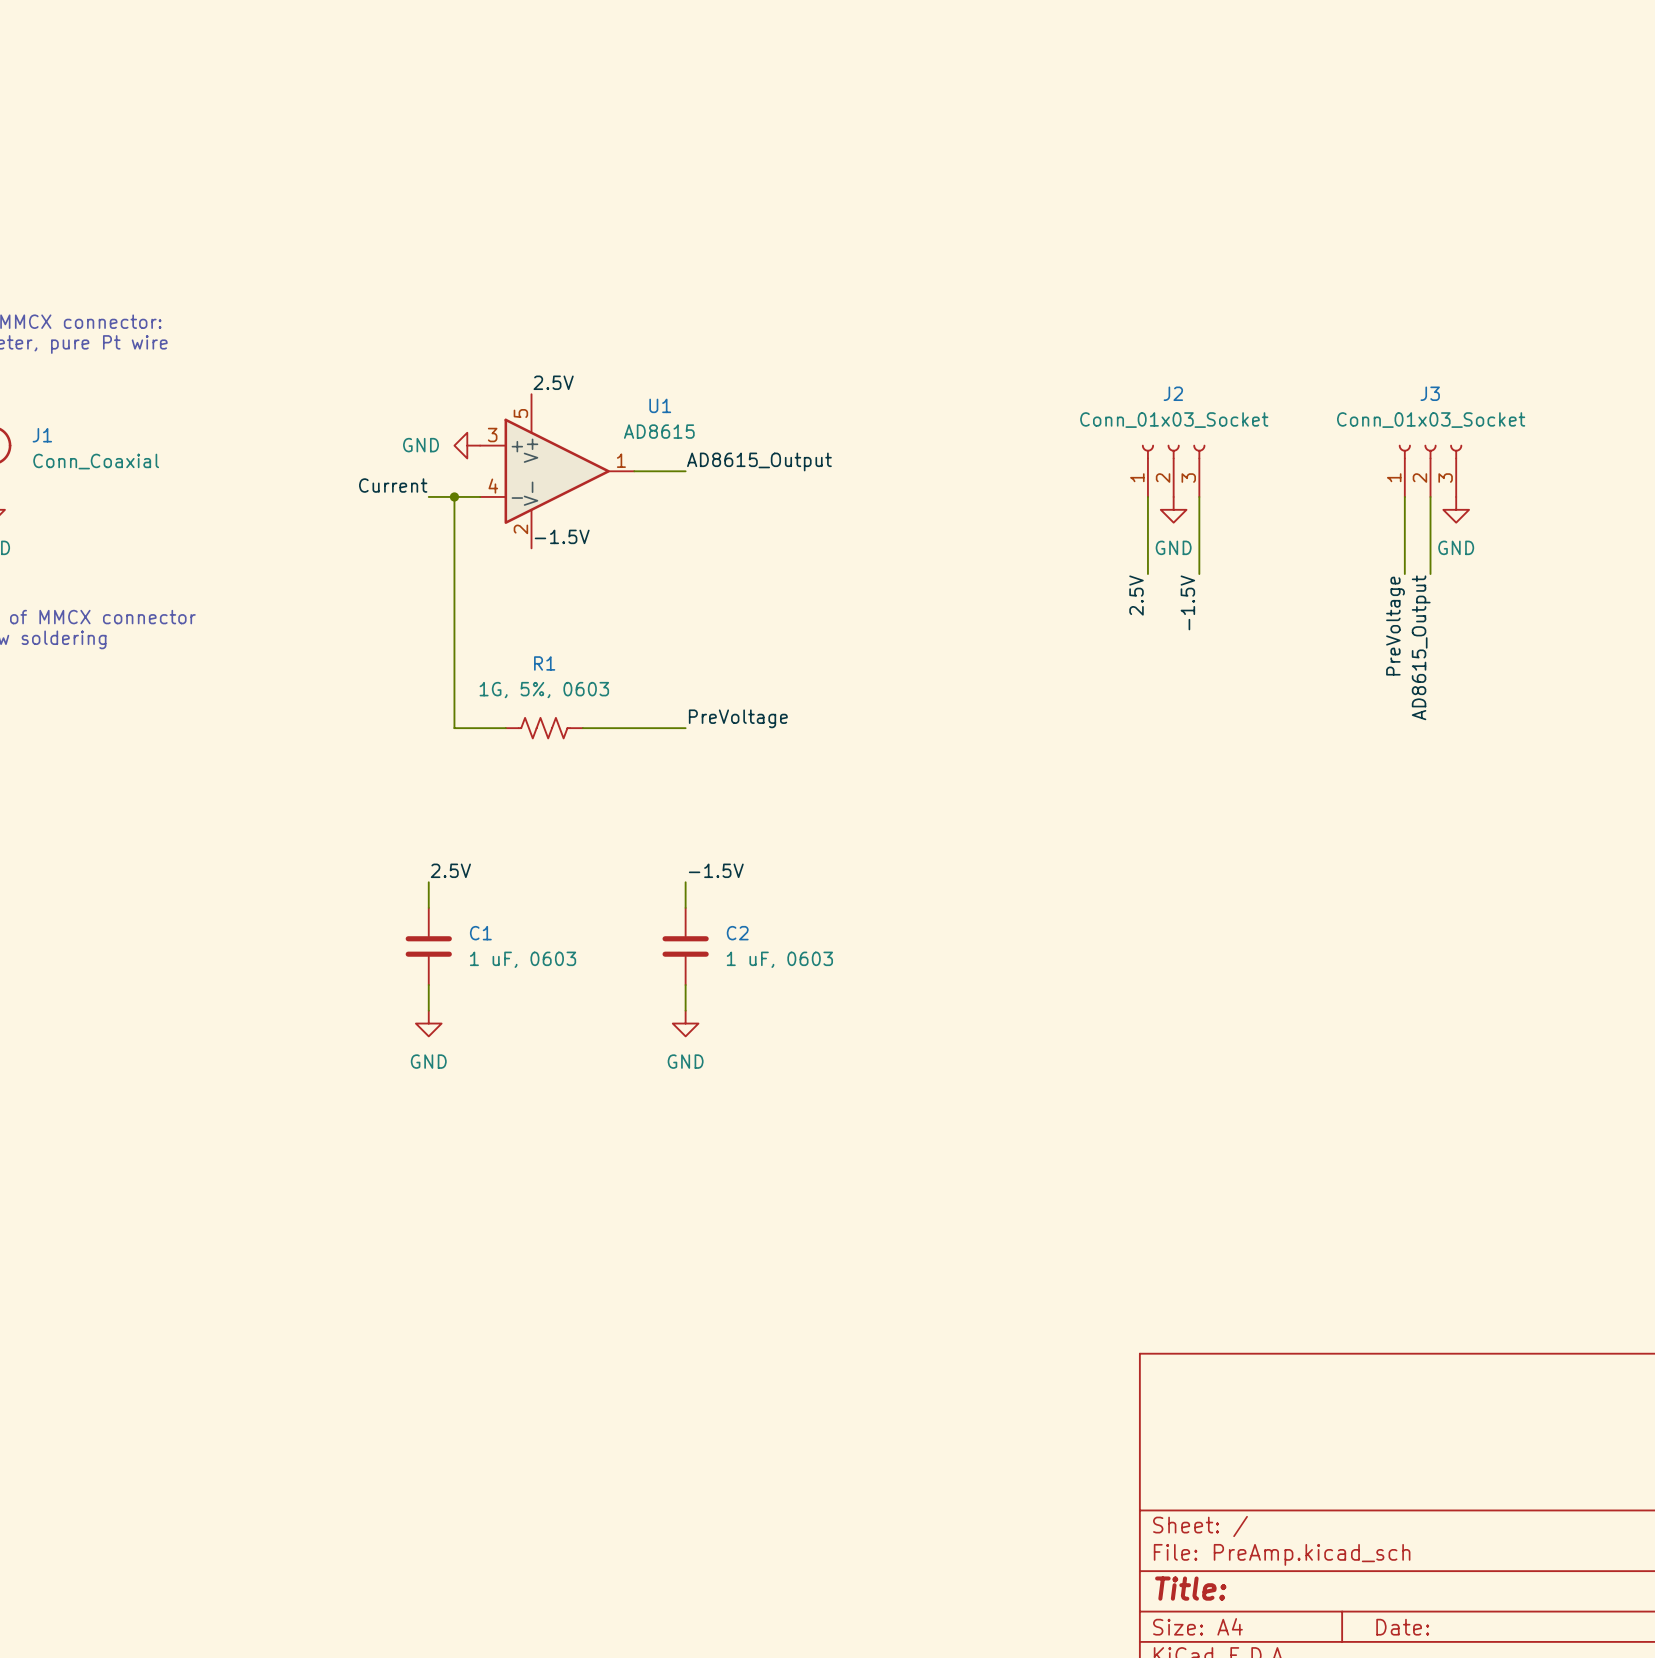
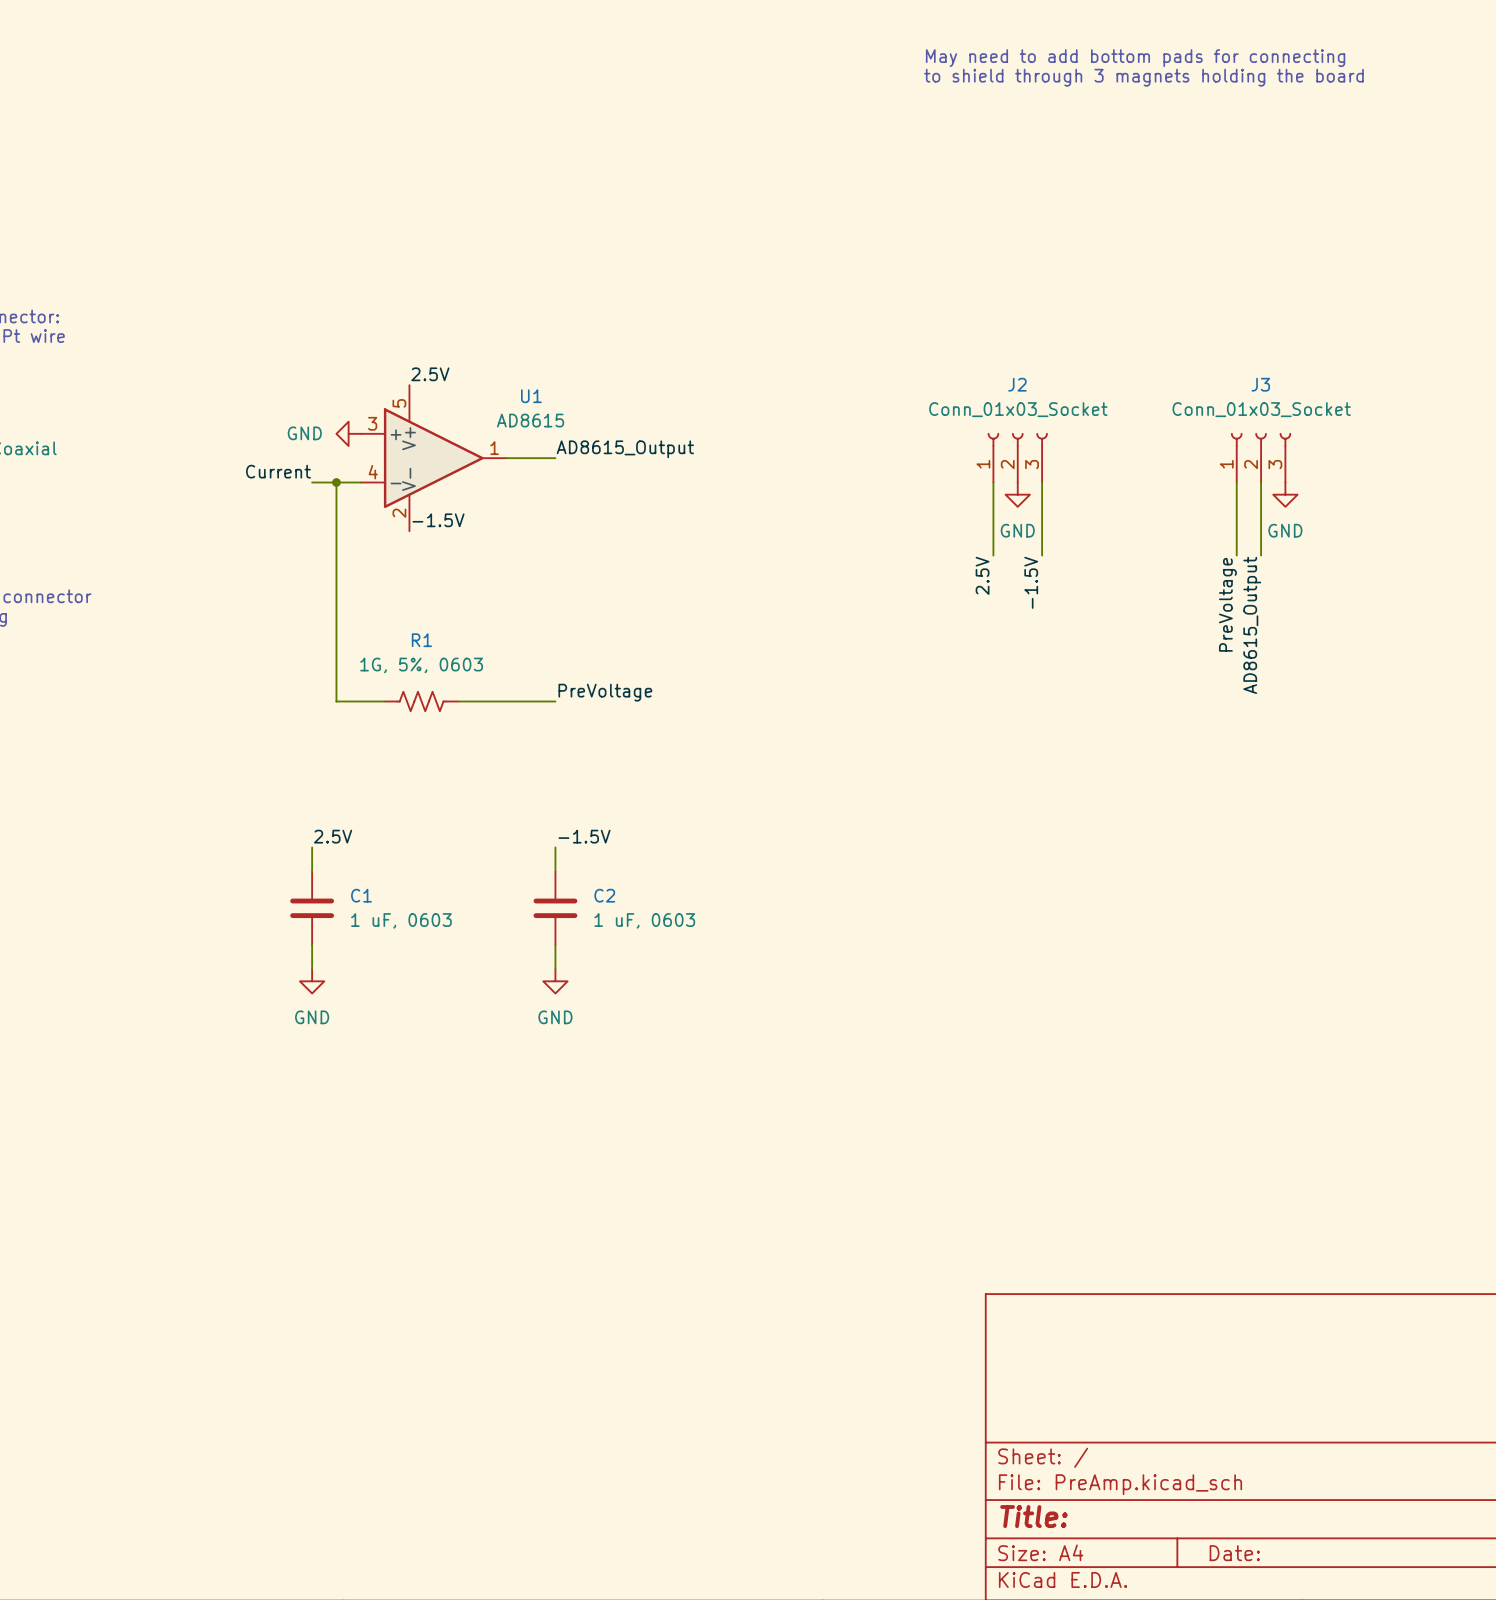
text: none -> May need to add bottom pads for connecting (1135, 58)
text: none -> to shield through 3 magnets holding the board (1143, 77)

